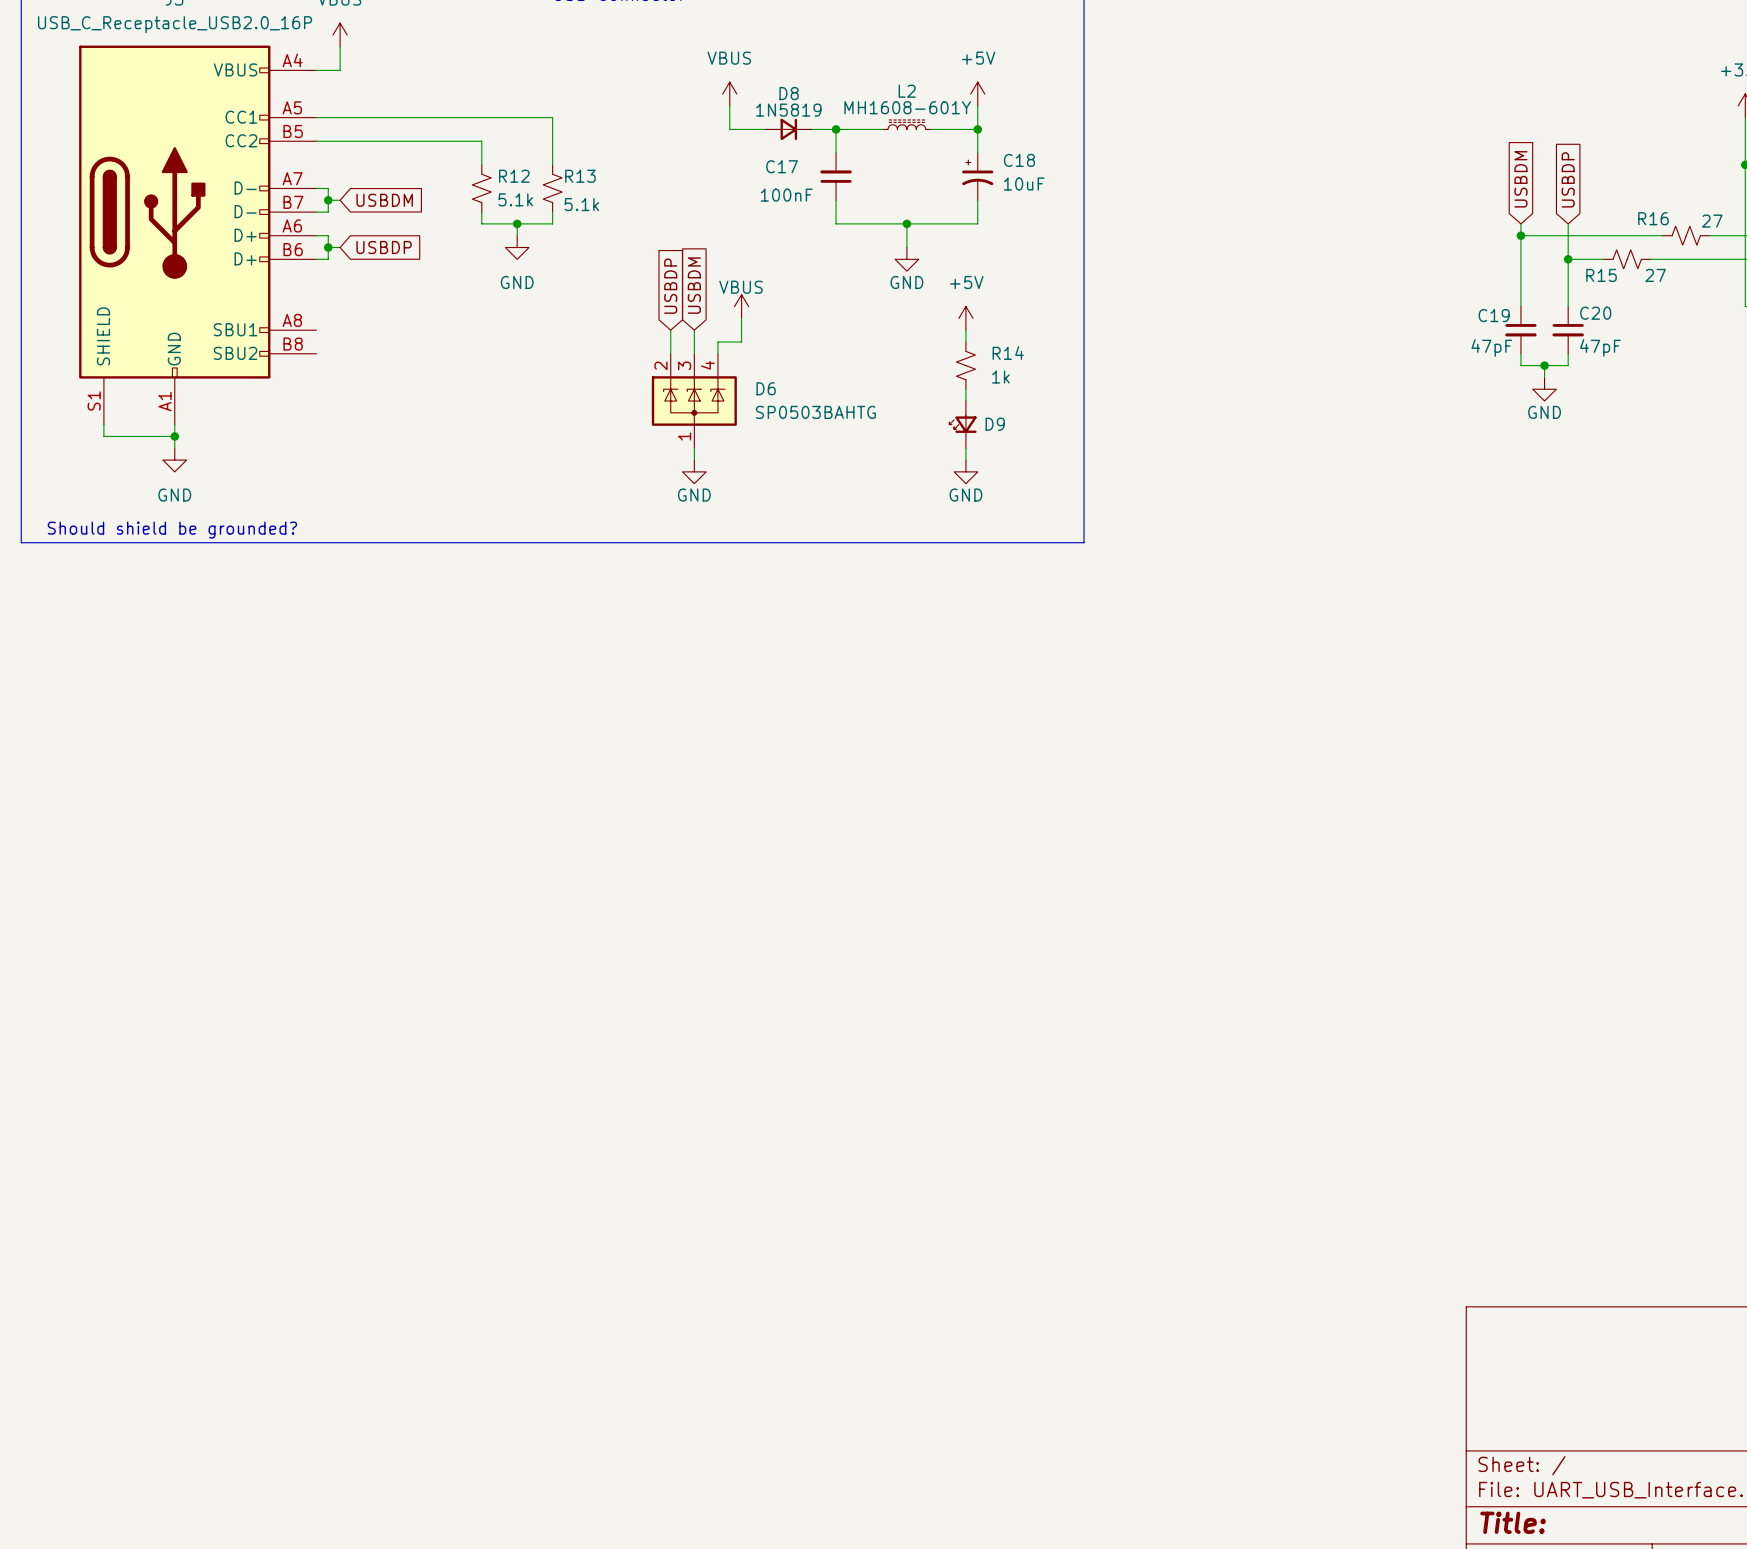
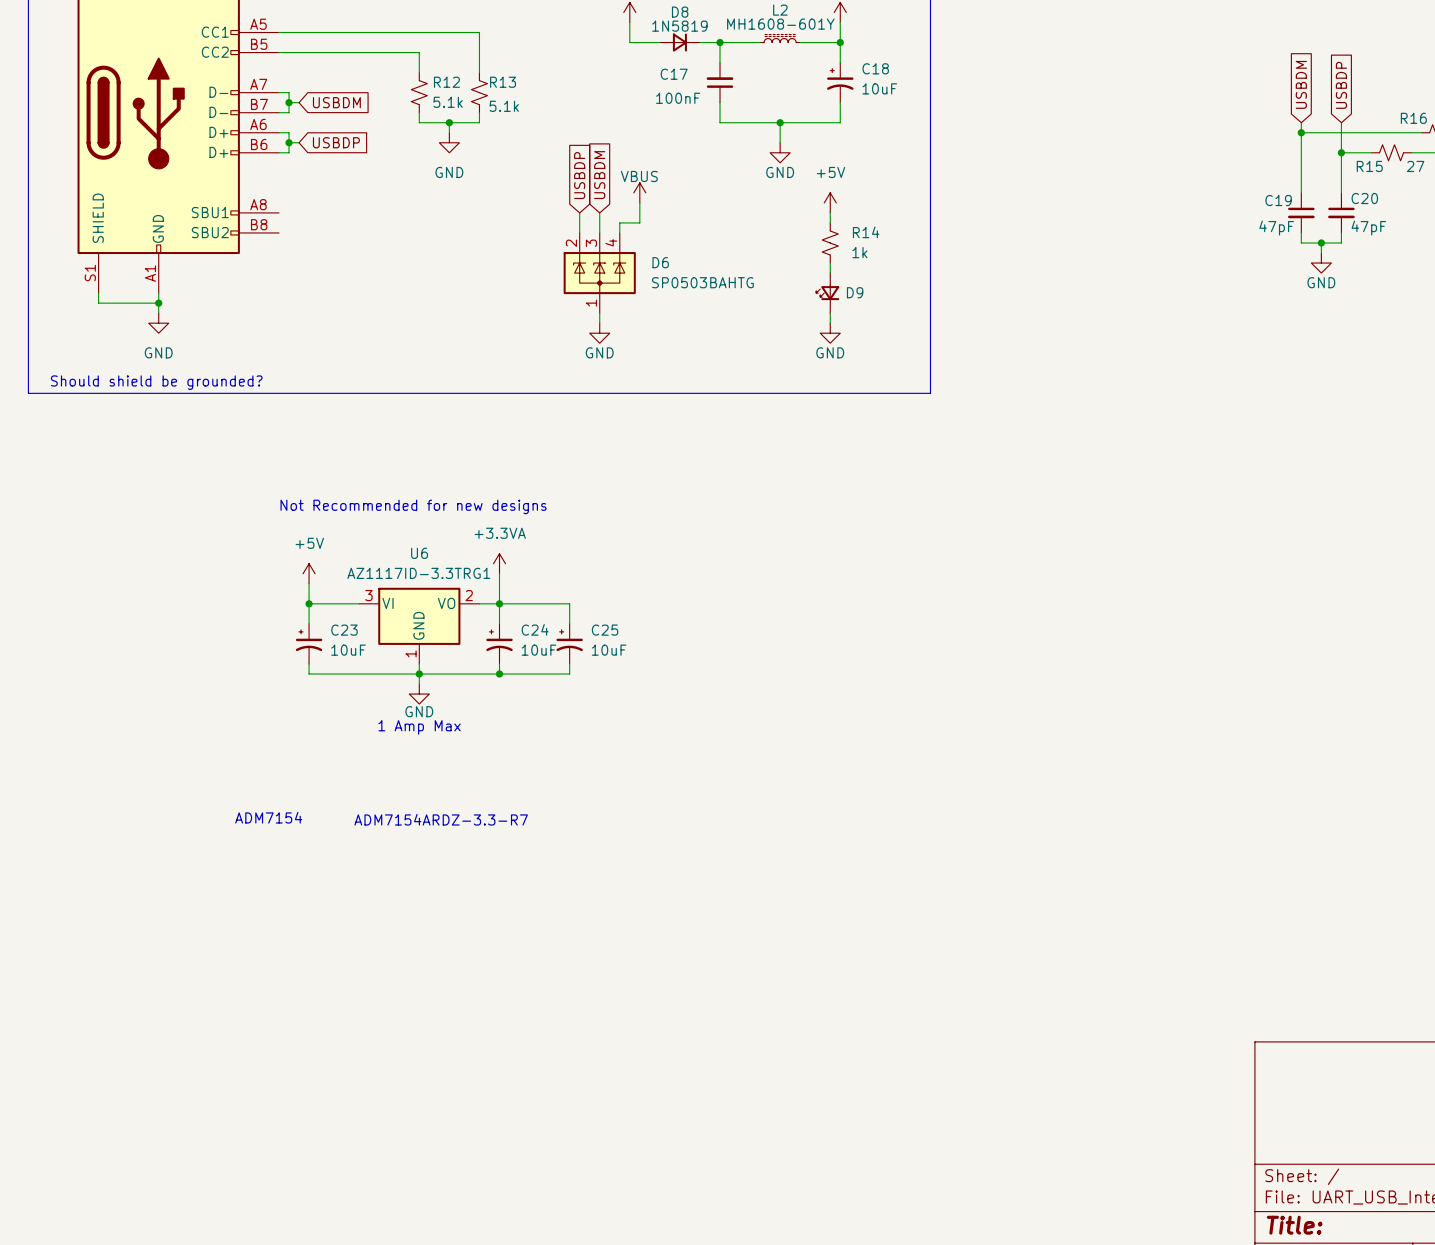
text: none -> Not Recommended for new designs (413, 506)
power symbol: none -> +3.3VA (499, 563)
power symbol: none -> +5V (309, 573)
wire: none -> (499, 573) (499, 623)
wire: none -> (309, 583) (309, 623)
wire: none -> (309, 603) (359, 603)
junction: none -> (309, 603)
wire: none -> (479, 603) (569, 603) (569, 623)
junction: none -> (499, 603)
U6: none -> AZ1117ID-3.3TRG1 (419, 625)
C23: none -> 10uF (309, 643)
C24: none -> 10uF (499, 643)
C25: none -> 10uF (569, 643)
wire: none -> (309, 663) (309, 673) (569, 673) (569, 663)
wire: none -> (419, 663) (419, 684)
wire: none -> (499, 663) (499, 673)
junction: none -> (419, 673)
junction: none -> (499, 673)
power symbol: none -> GND (419, 694)
text: none -> 1 Amp Max (419, 727)
text: none -> ADM7154 (268, 817)
text: none -> ADM7154ARDZ-3.3-R7 (441, 819)

